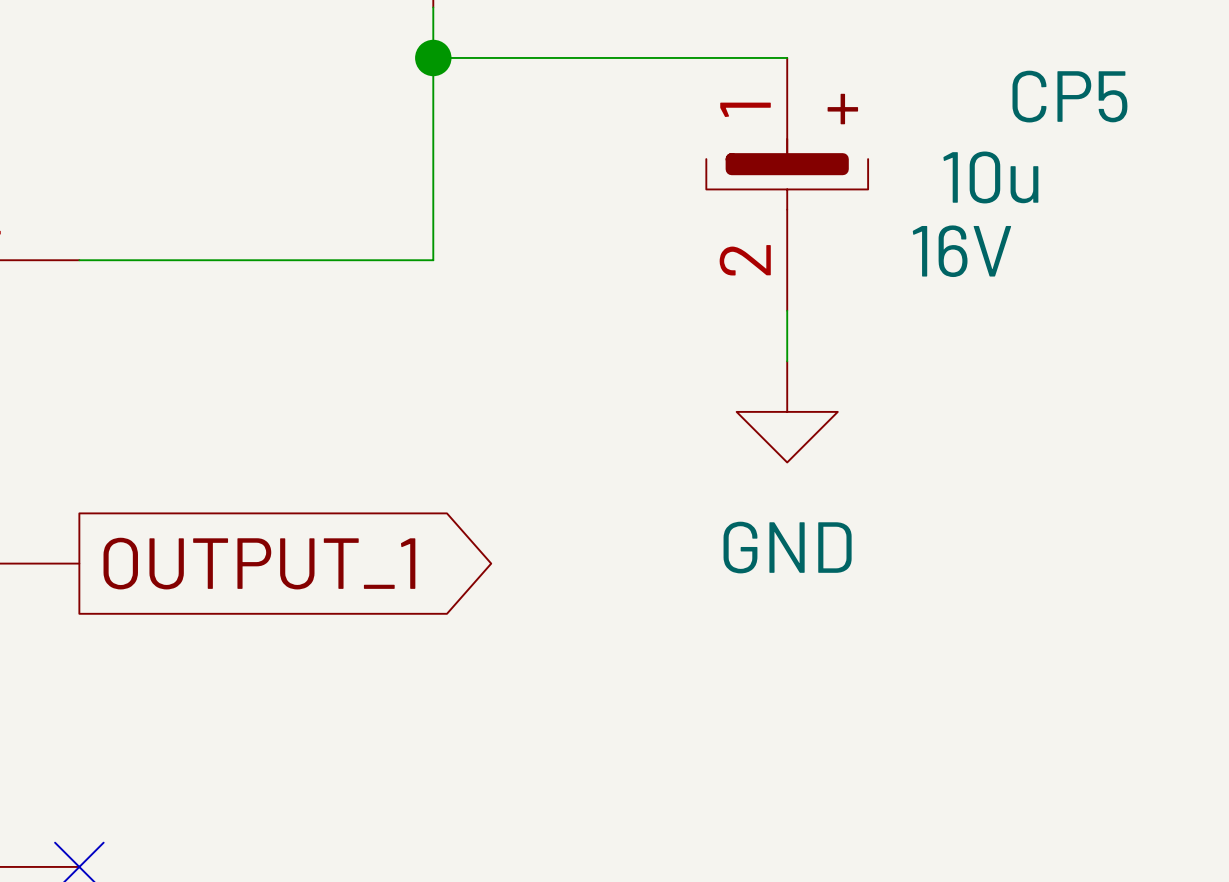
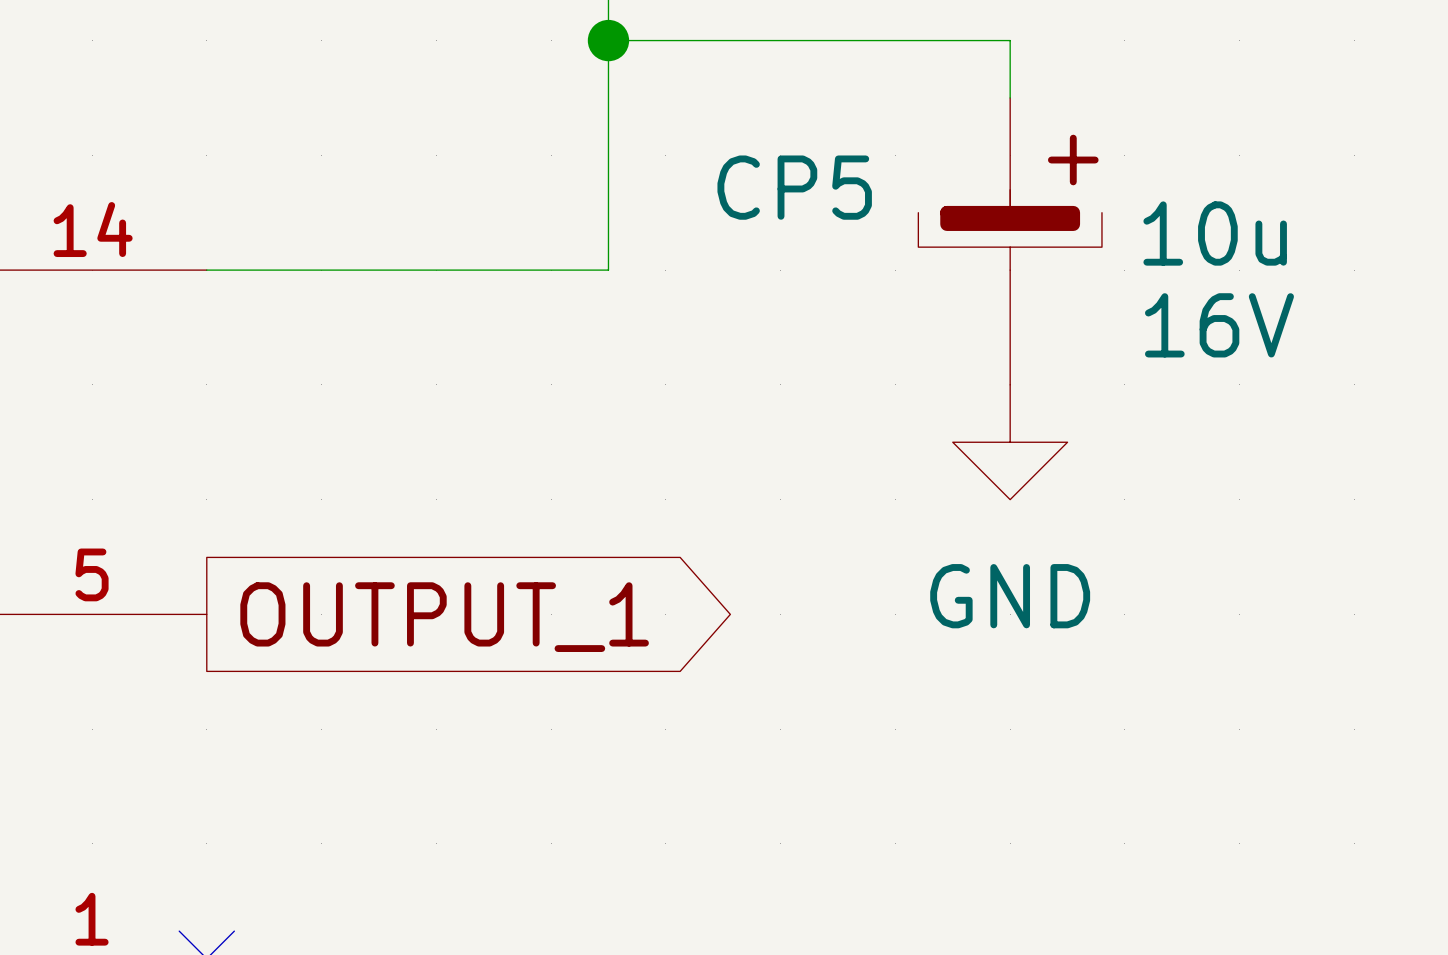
CP5 symbol: [675, 57, 869, 311] -> [883, 97, 1102, 385]
CP5 name position: CP5 (1069, 96) -> CP5 (794, 187)

